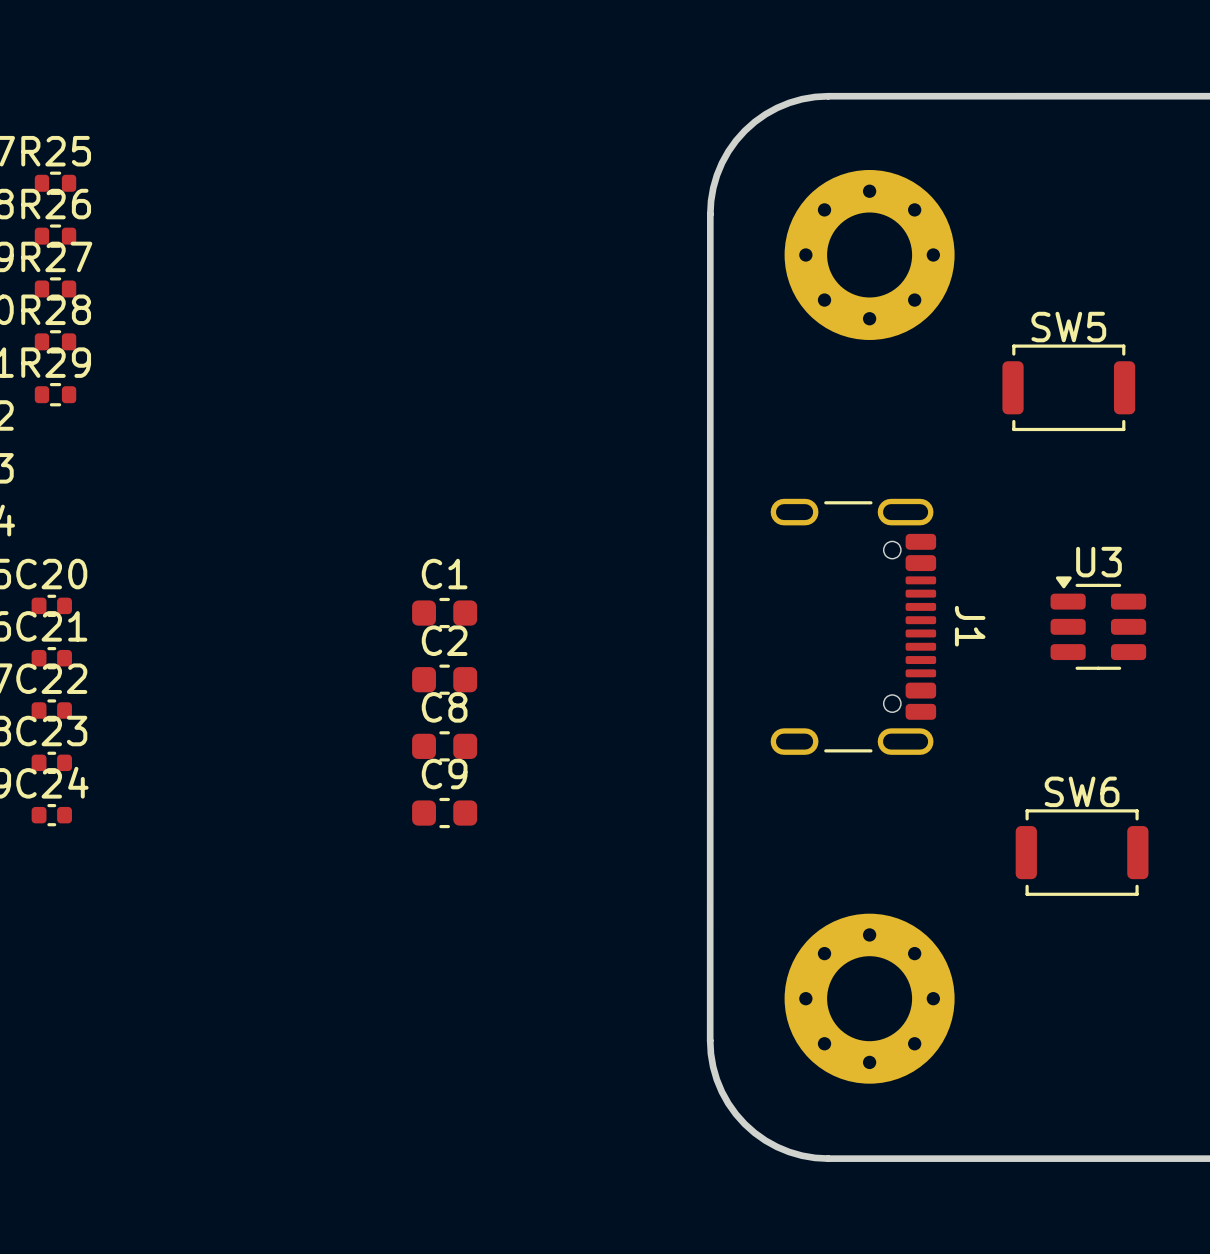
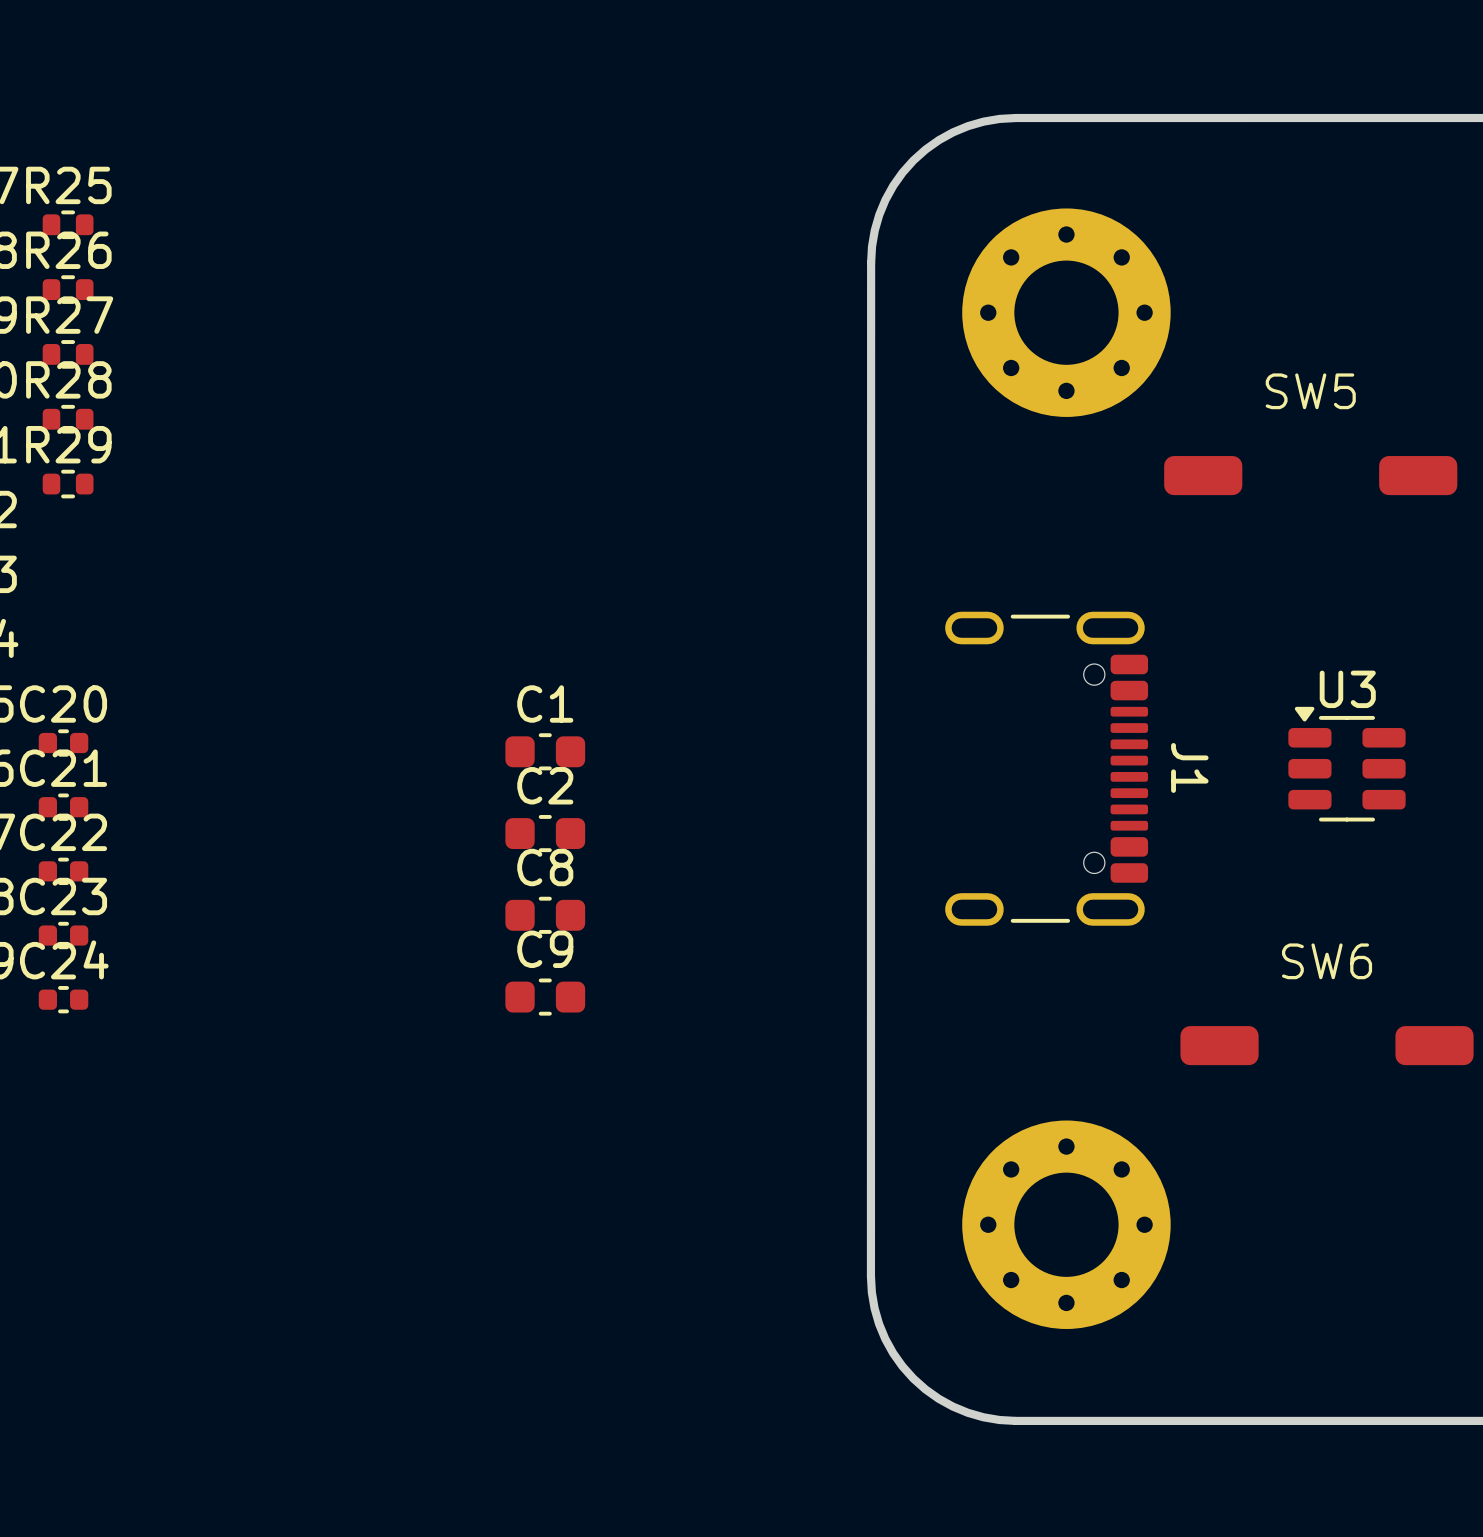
SW5 footprint: [1002, 344, 1136, 432] -> [1164, 456, 1458, 496]
SW6 footprint: [1015, 809, 1149, 896] -> [1180, 1026, 1474, 1066]

